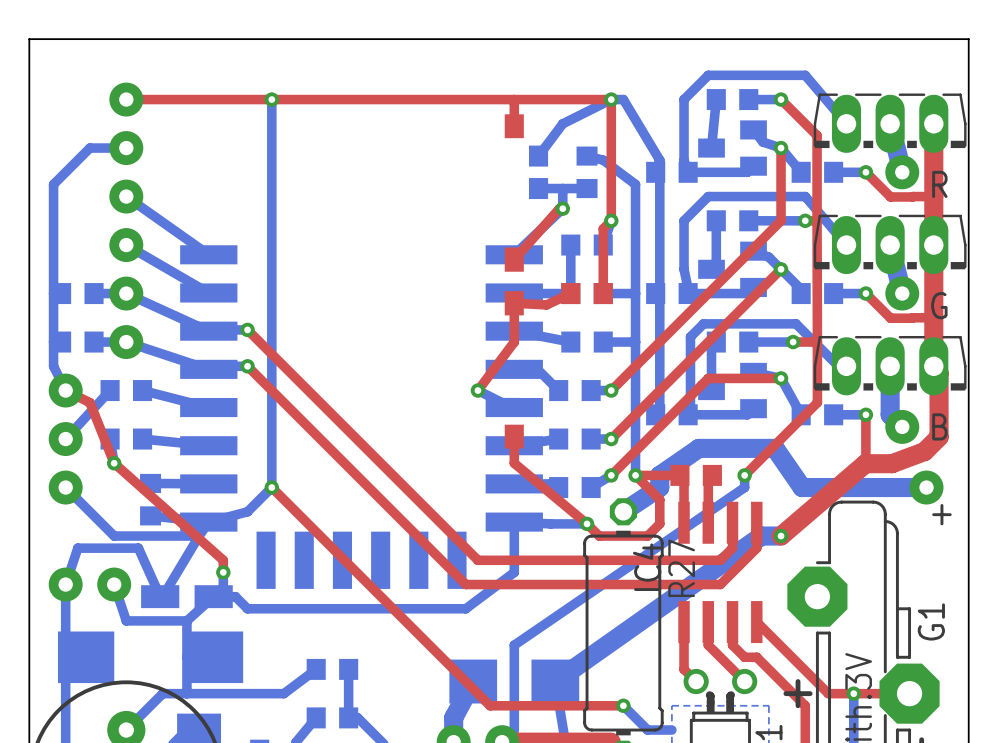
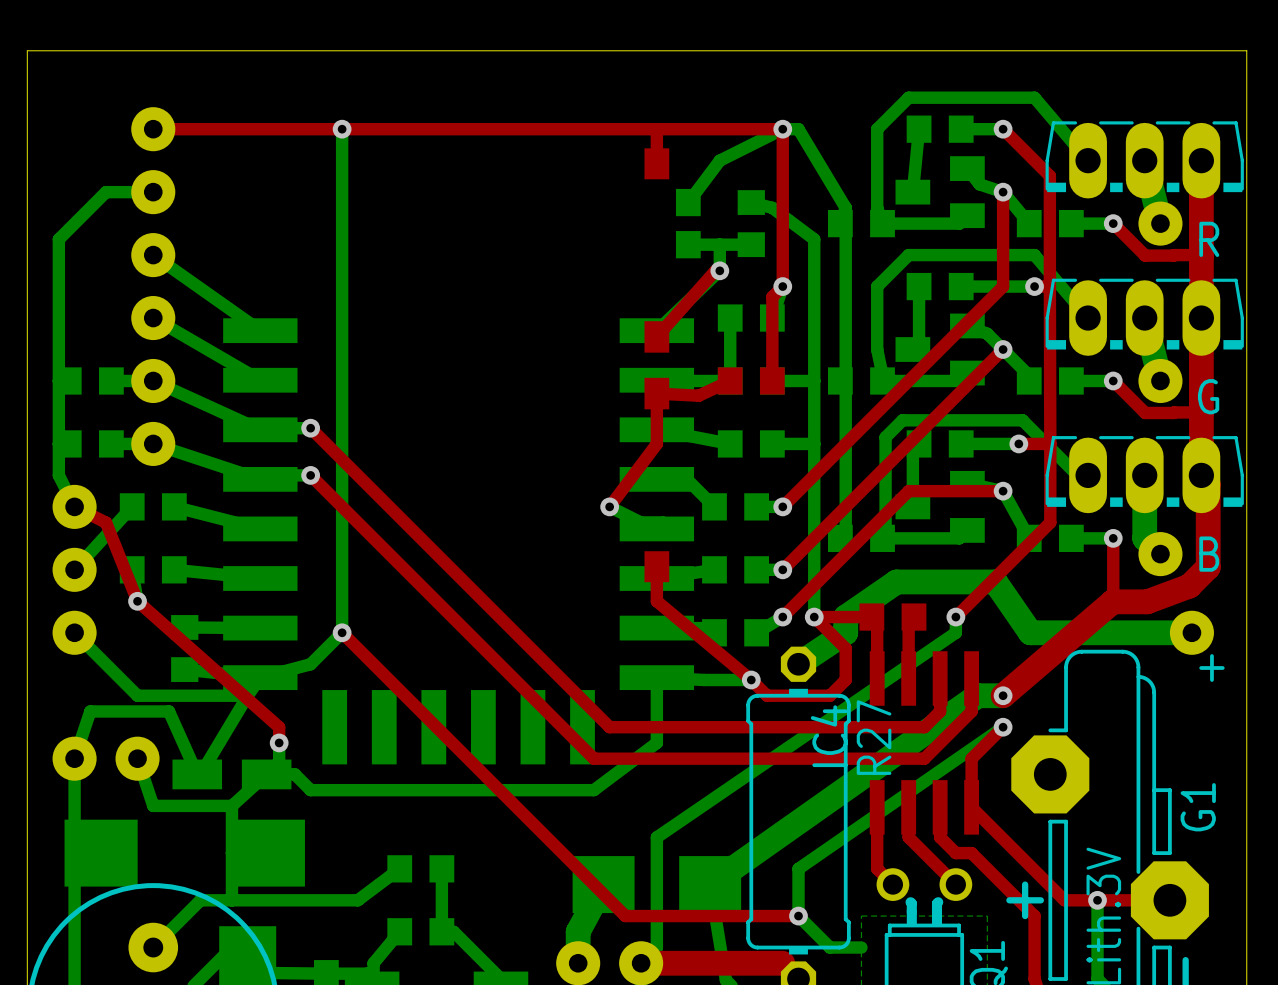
bottom track: none -> (1003, 727) (798, 868) (798, 916)
top track: none -> (1003, 727) (971, 758) (971, 807)
via: none -> (1003, 727)

